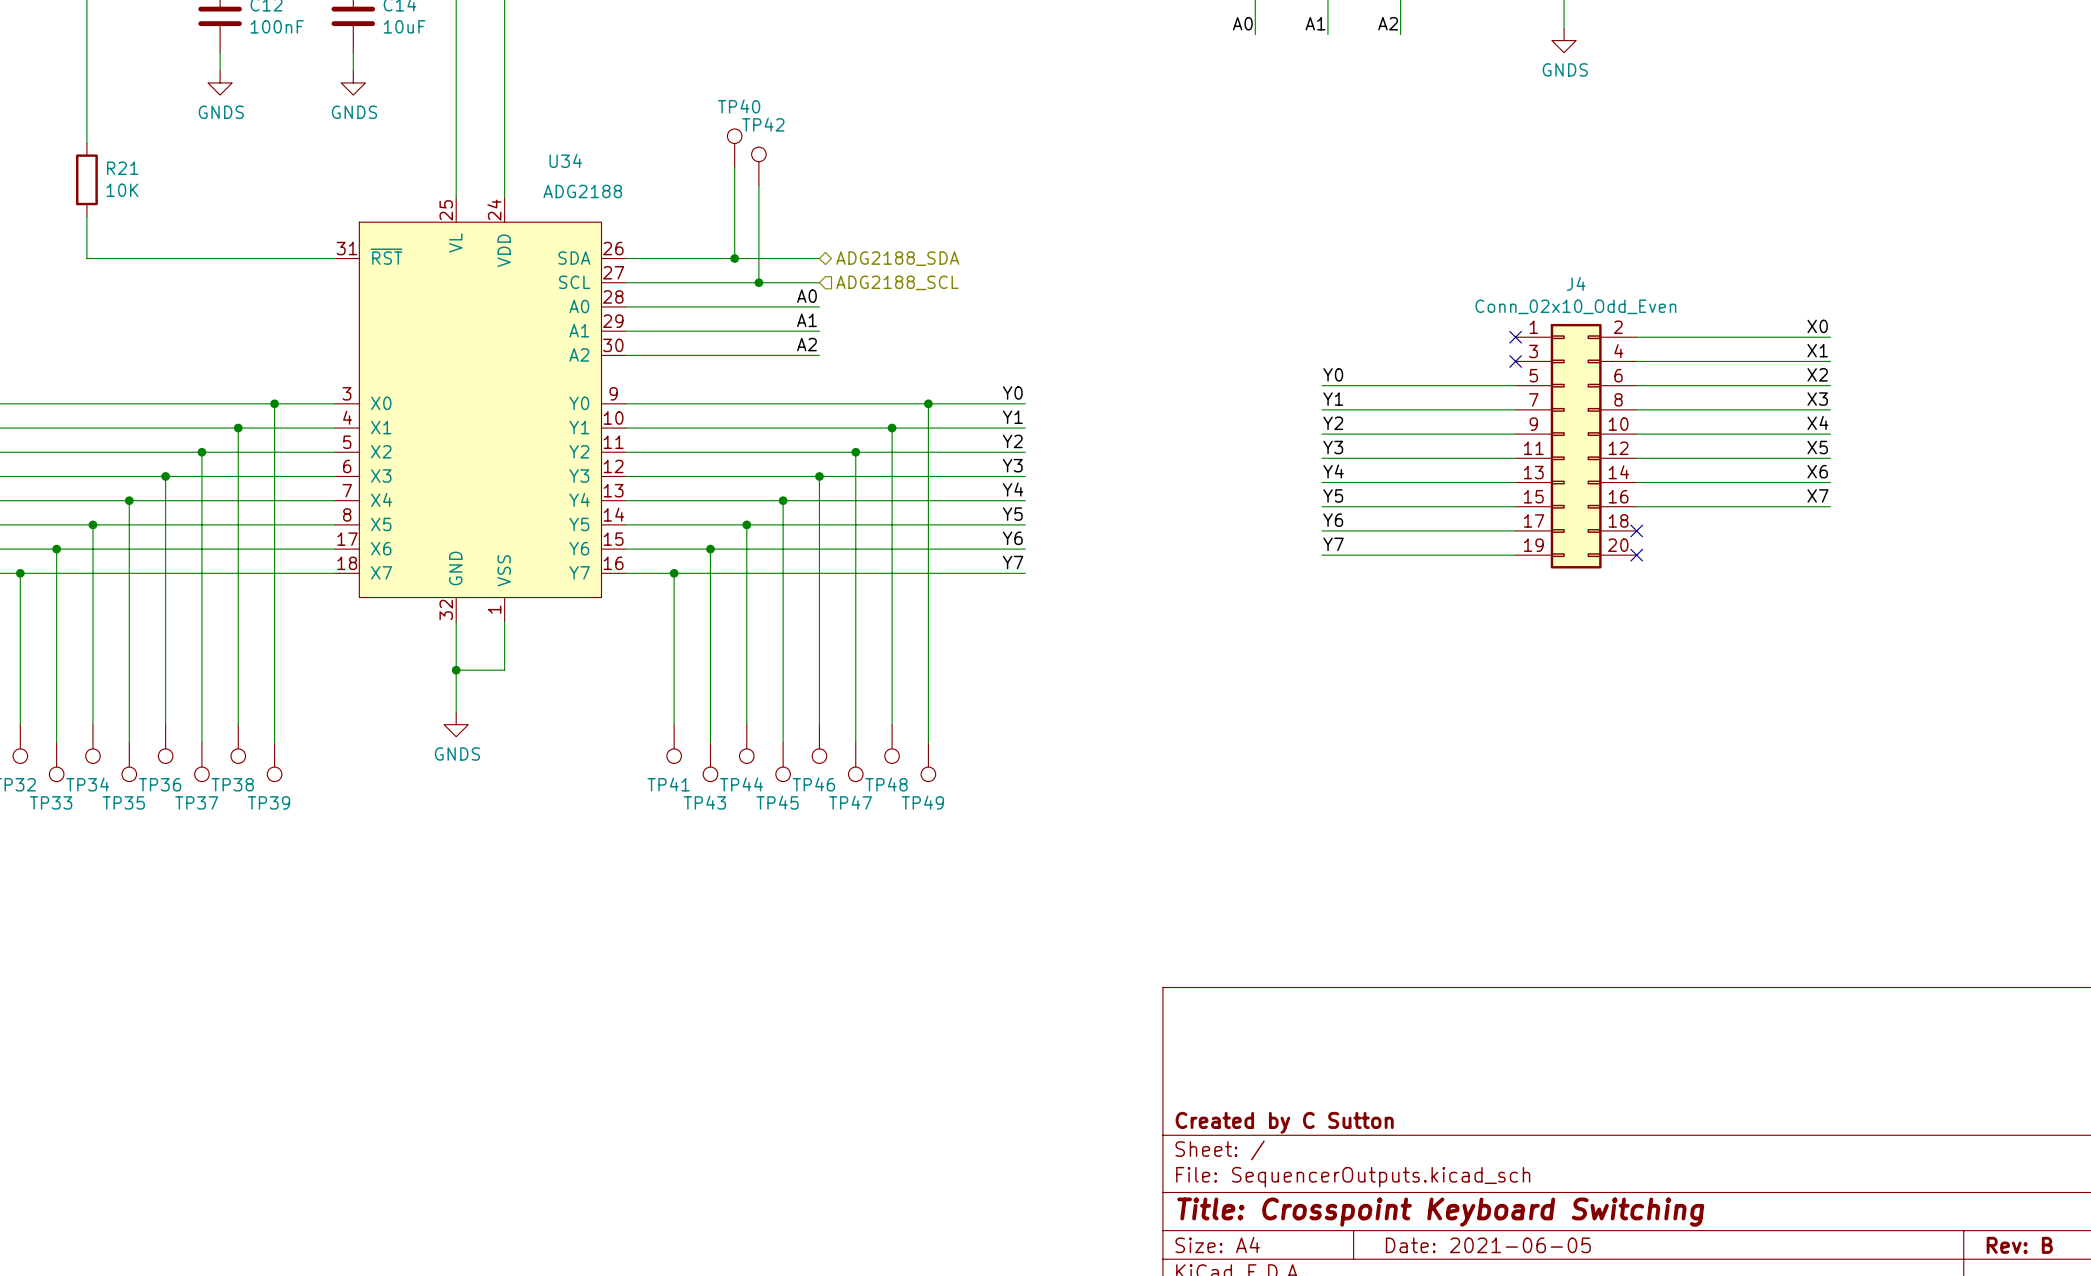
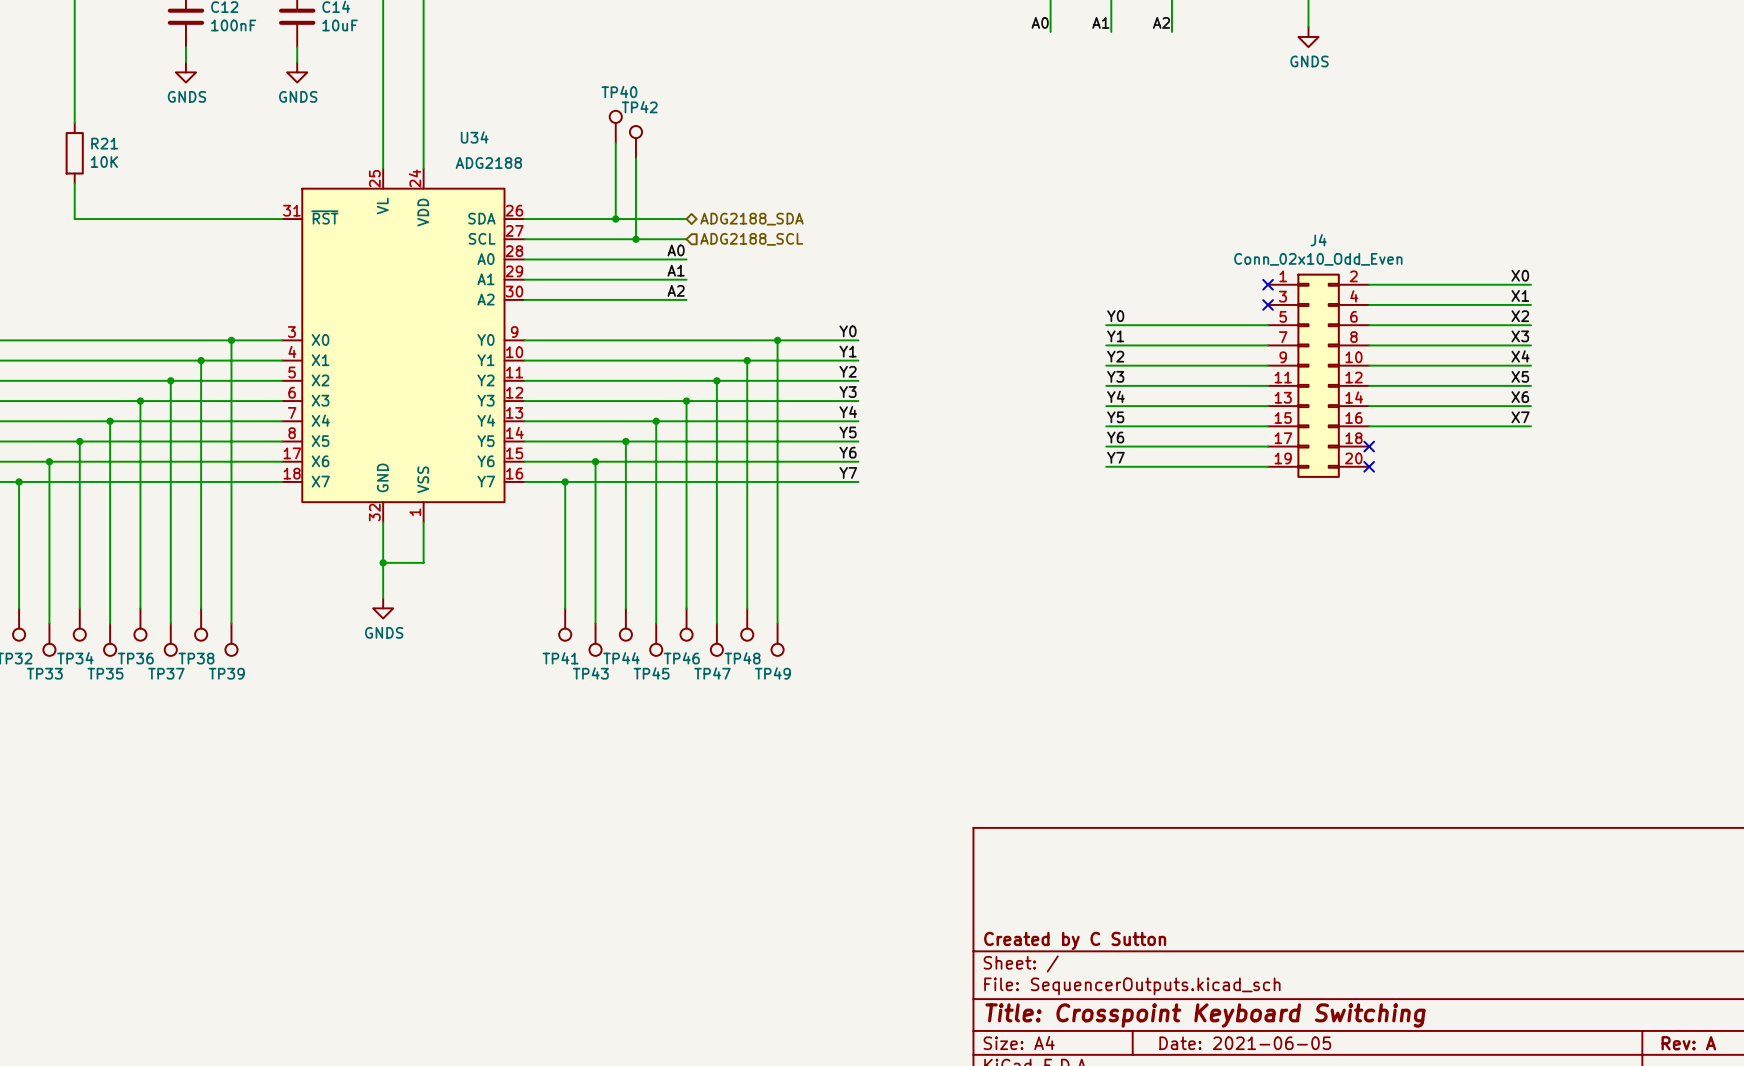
title block: Rev: B (2019, 1245) -> Rev: A (1688, 1043)

